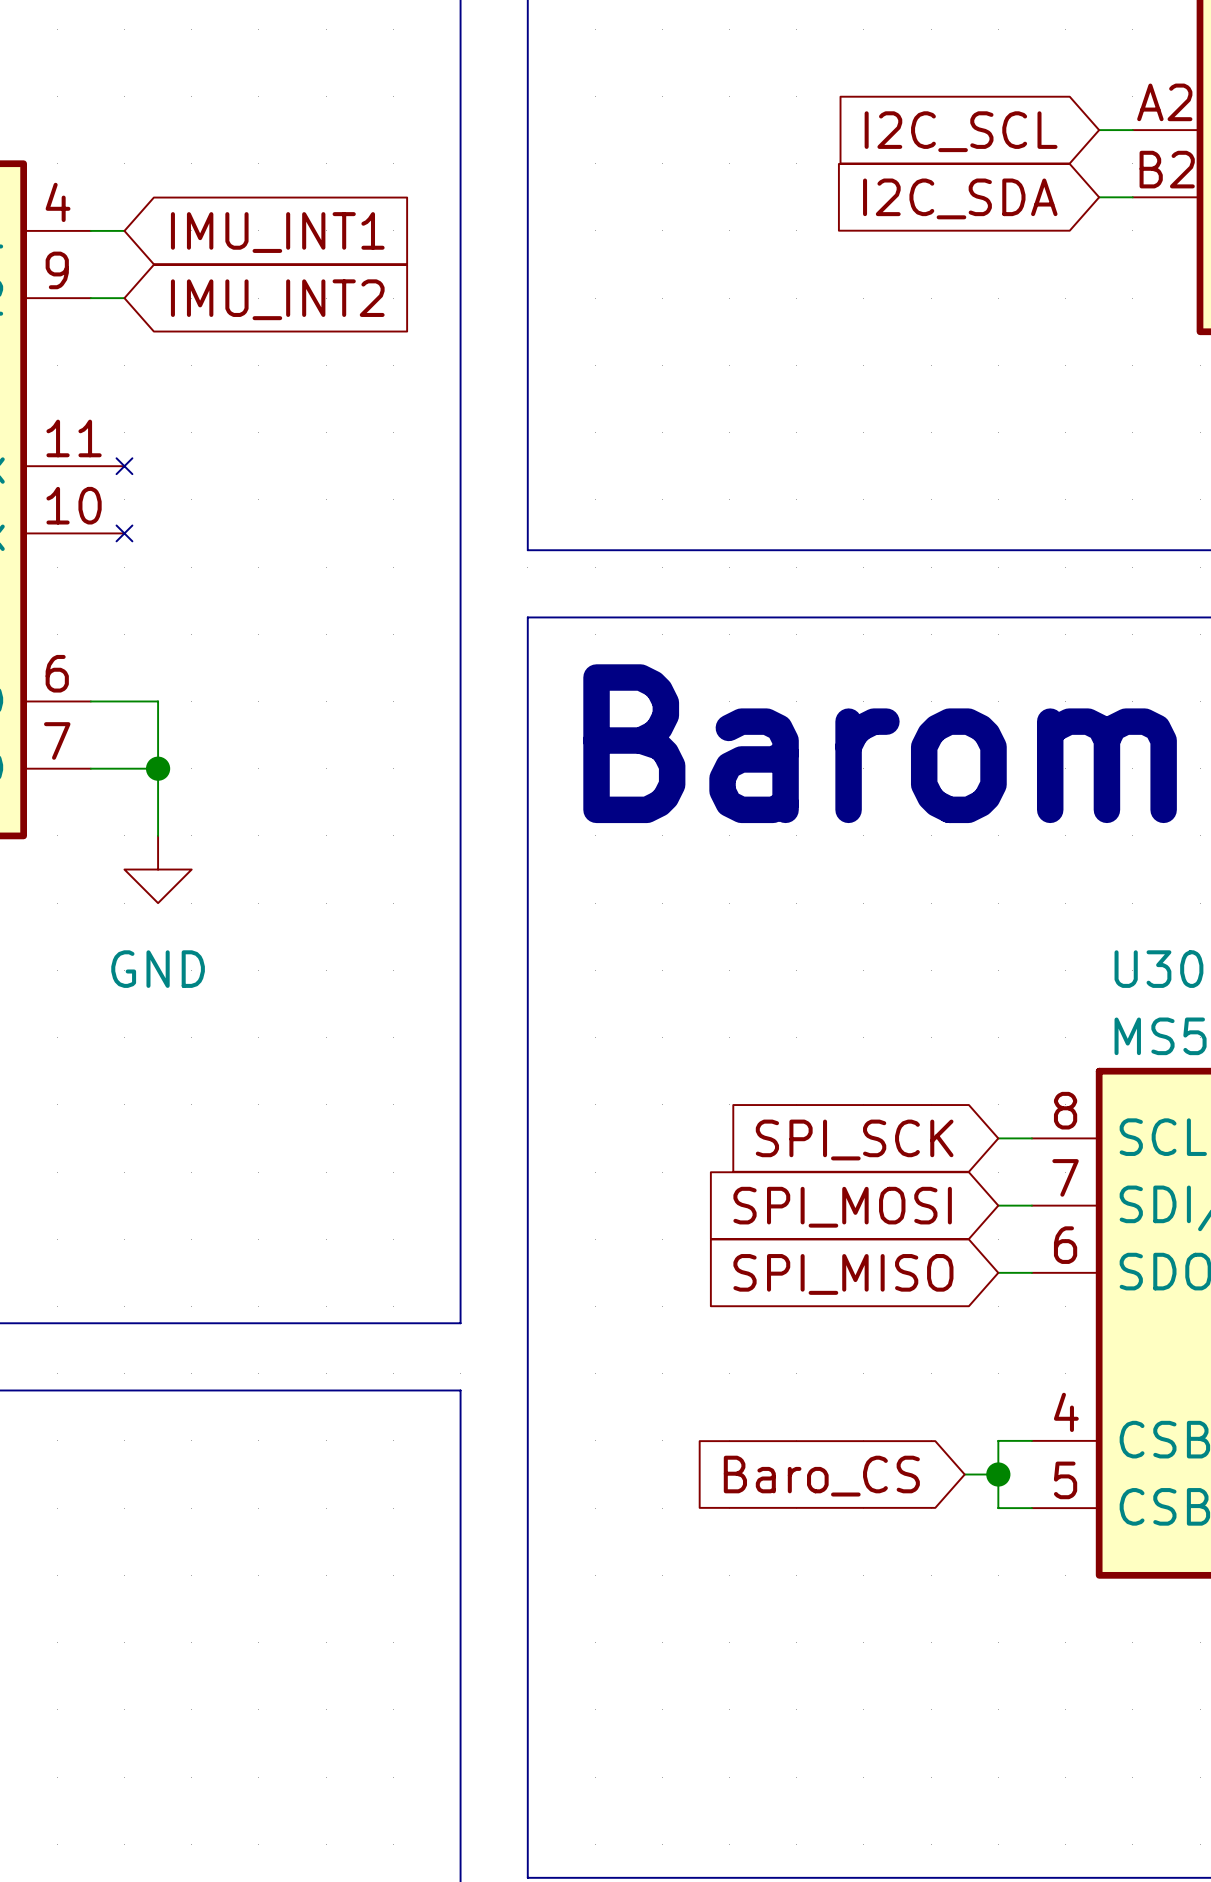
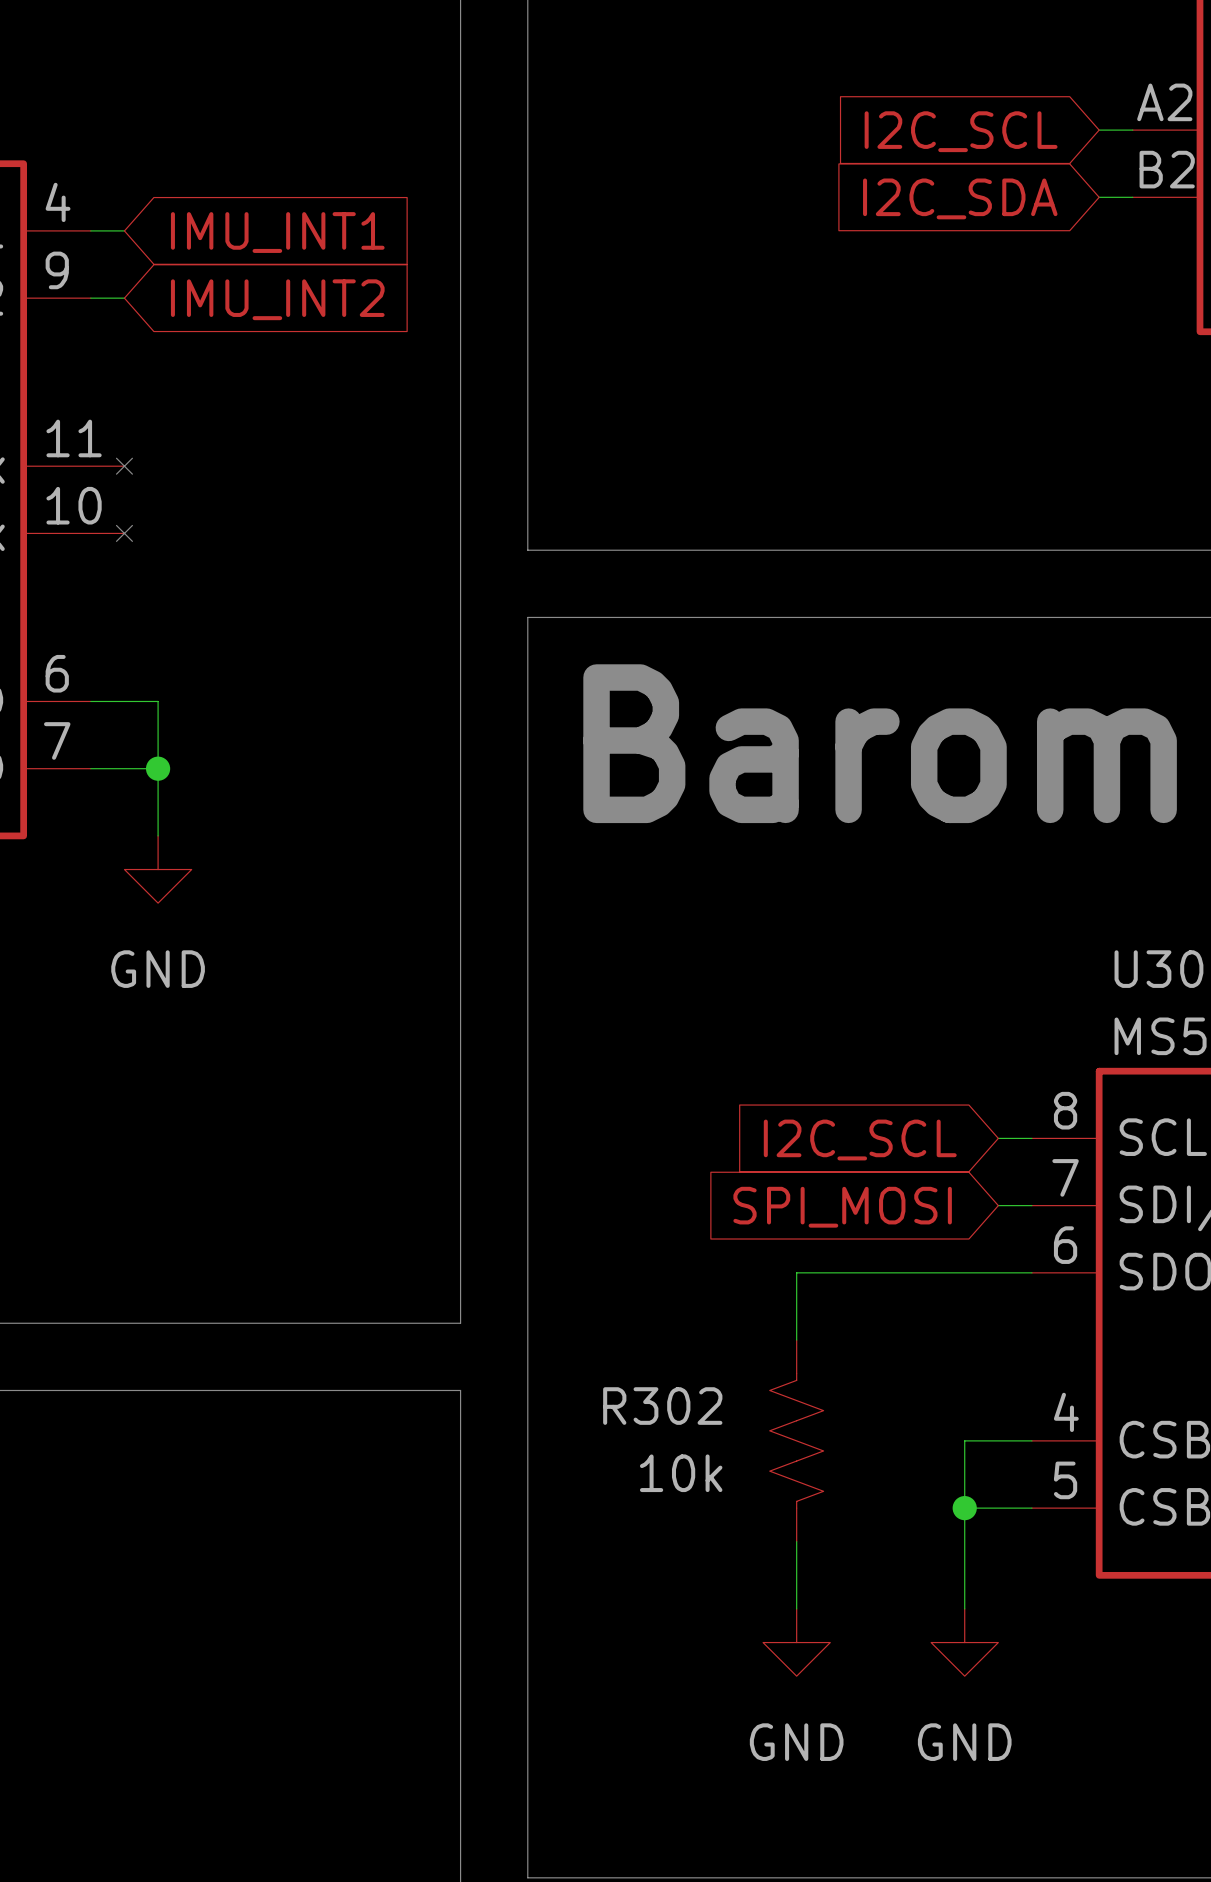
global label: SPI_SCK (854, 1140) -> I2C_SCL (860, 1140)
wire: none -> (998, 1272) (796, 1272) (796, 1340)
global label: SPI_MISO (843, 1274) -> none
R302: none -> 10k (796, 1440)
wire: (998, 1440) (998, 1508) -> (964, 1508) (998, 1508)
wire: none -> (998, 1440) (964, 1440) (964, 1608)
wire: (964, 1474) (998, 1474) -> none
junction position: (998, 1474) -> (964, 1508)
global label: Baro_CS (821, 1476) -> none
wire: none -> (796, 1541) (796, 1608)
power symbol: none -> GND (796, 1642)
power symbol: none -> GND (964, 1642)

